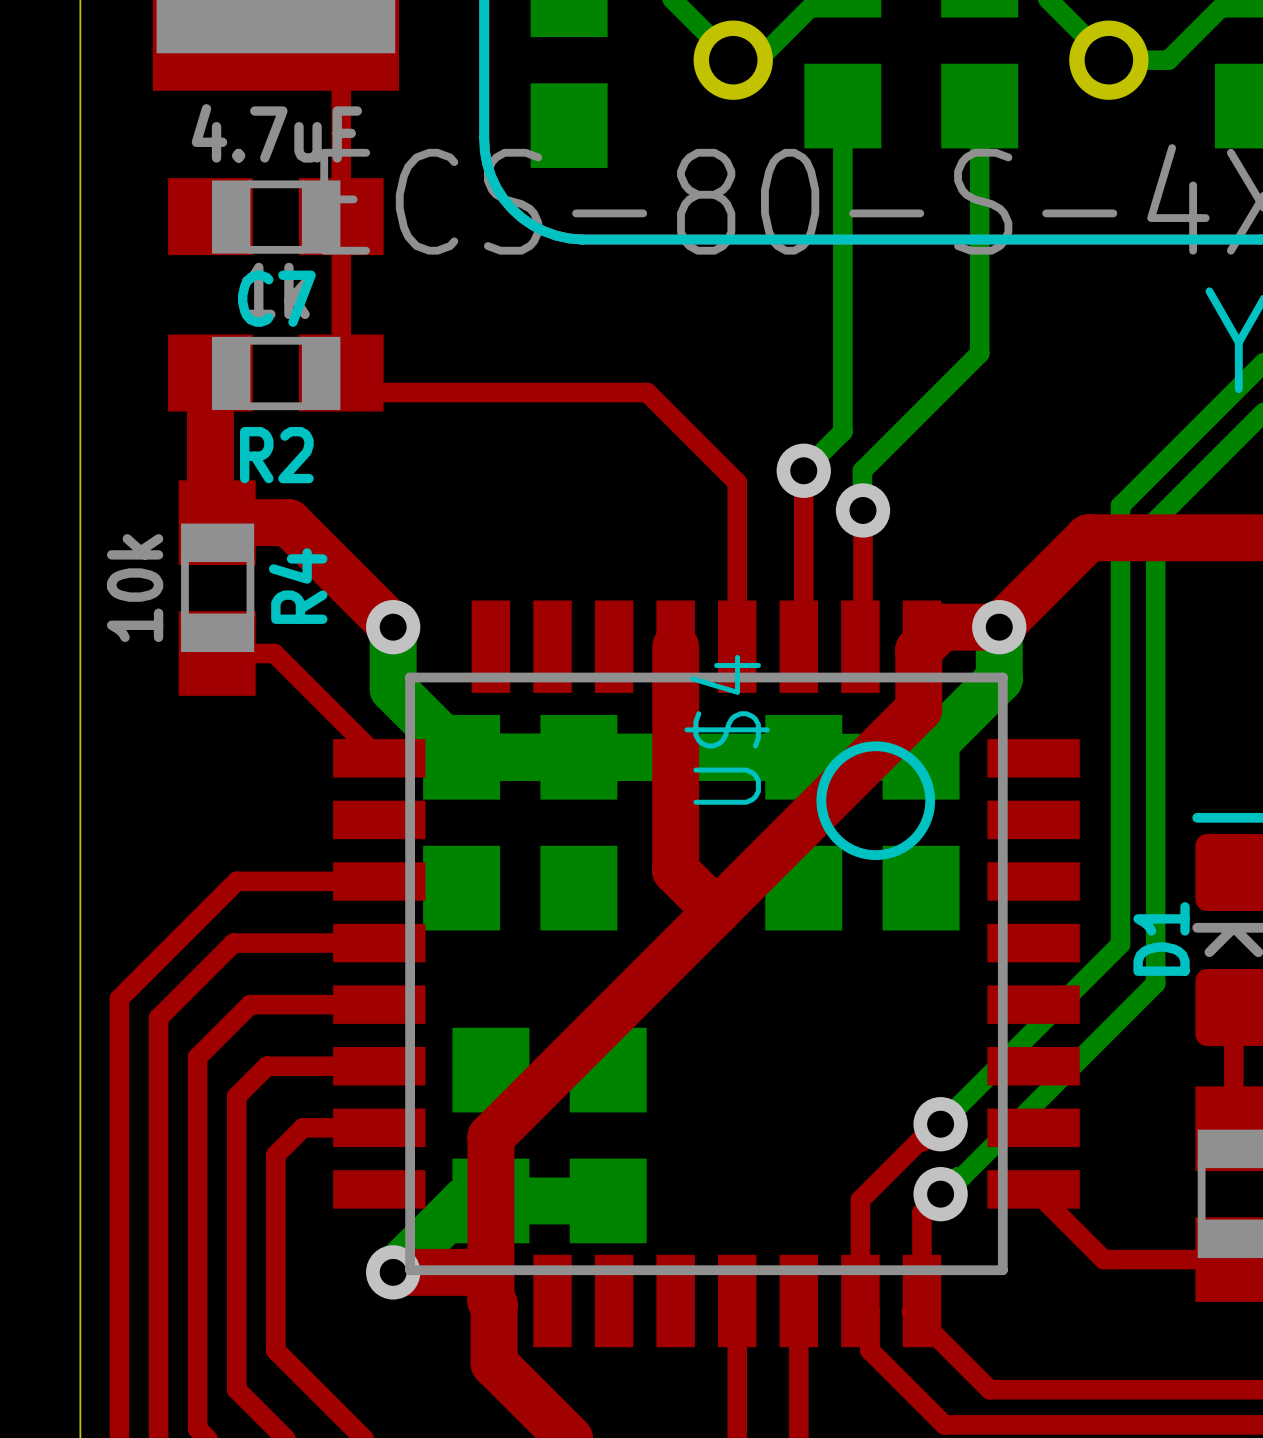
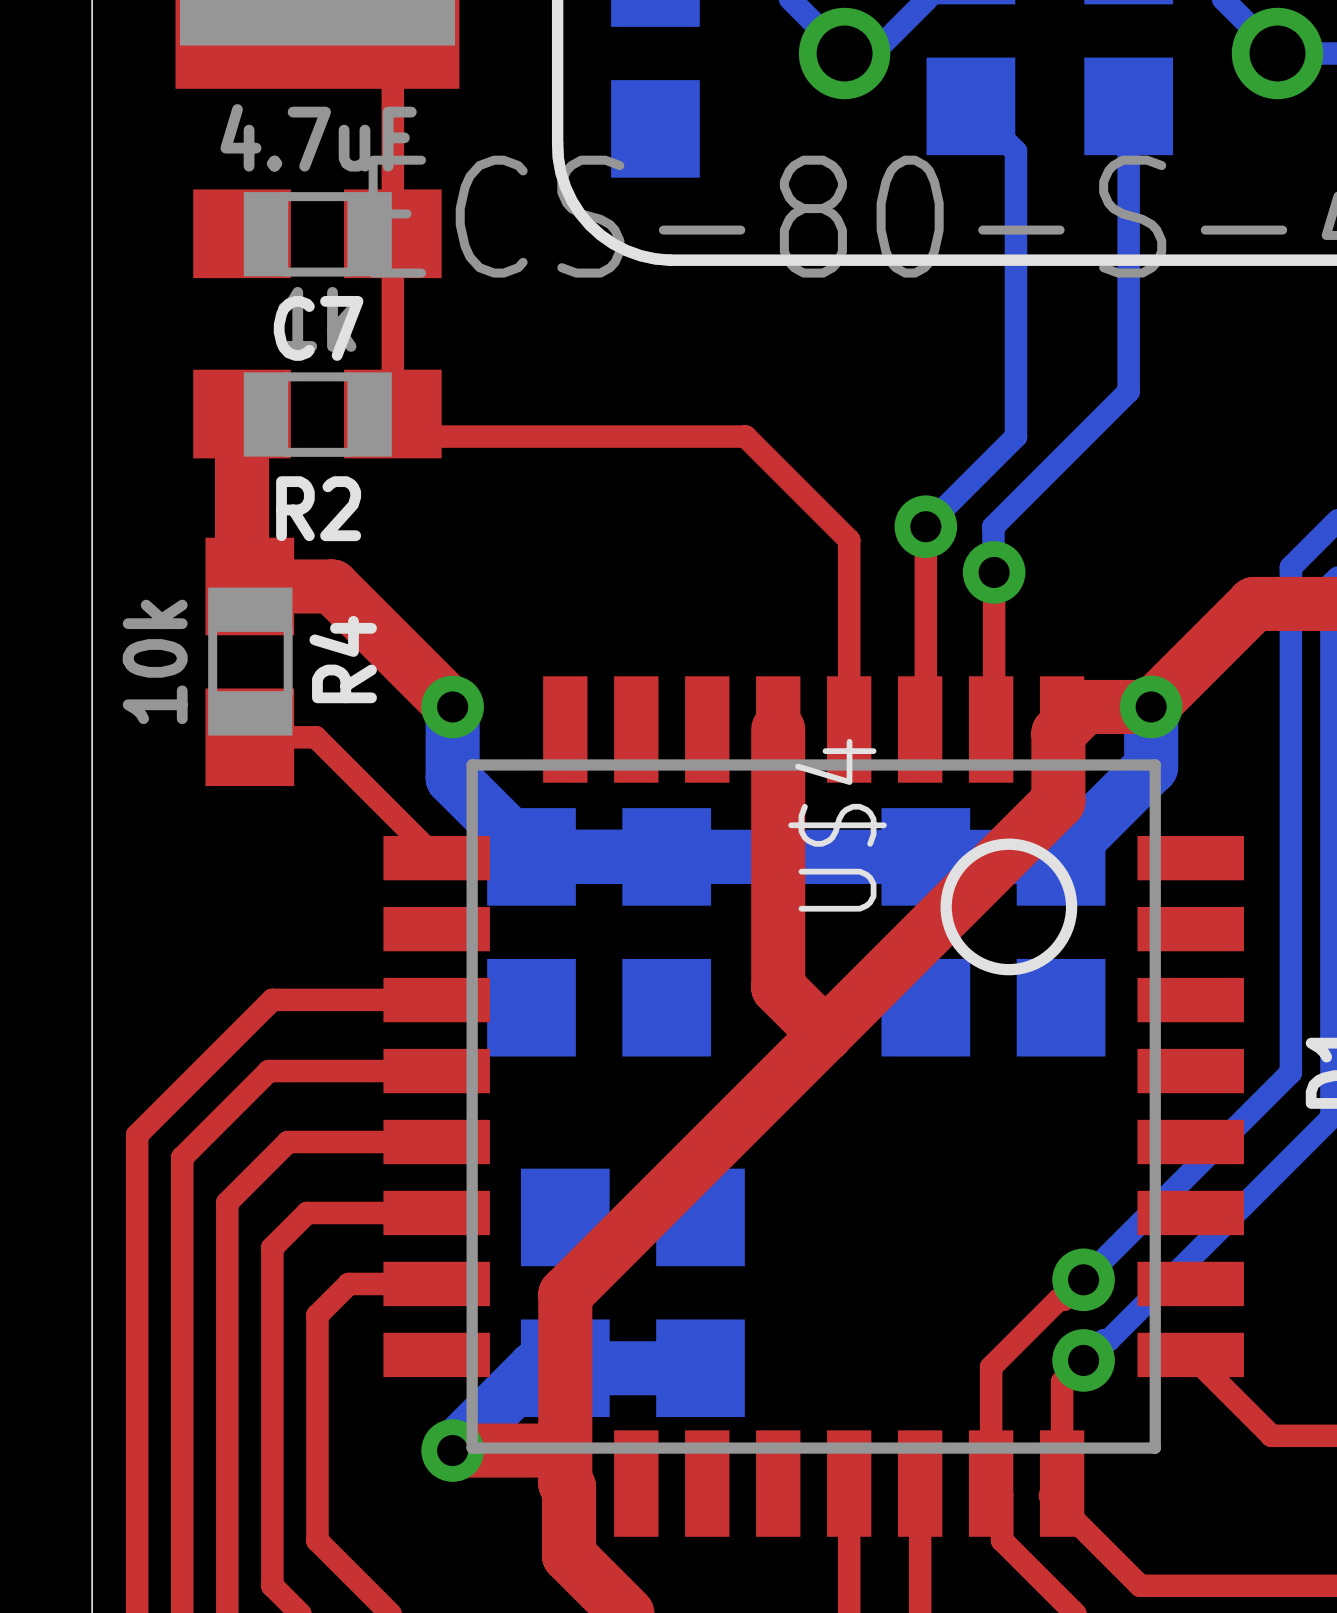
bottom track: (842, 106) (842, 431) -> (970, 106) (1015, 151) (1015, 436) (970, 481)

